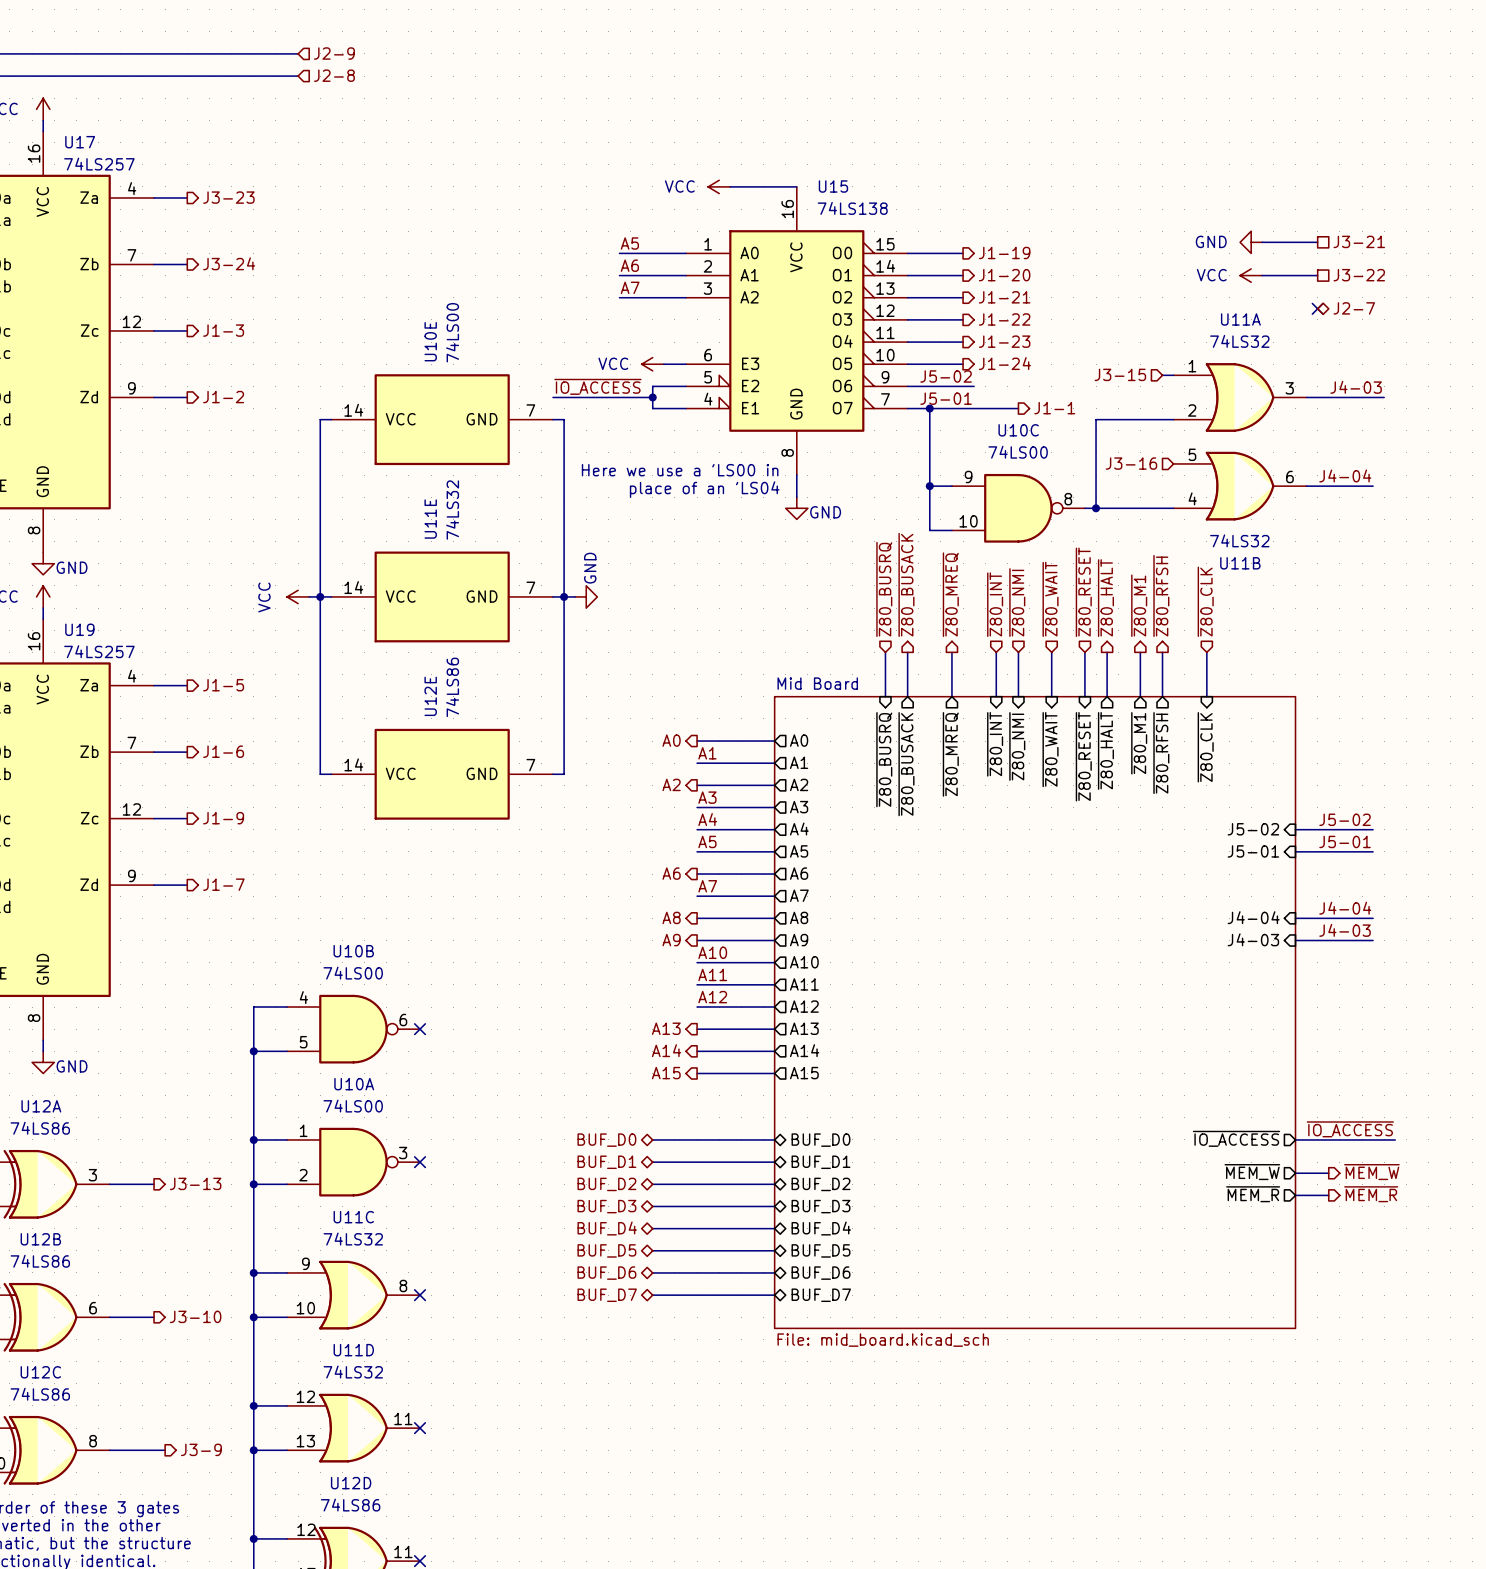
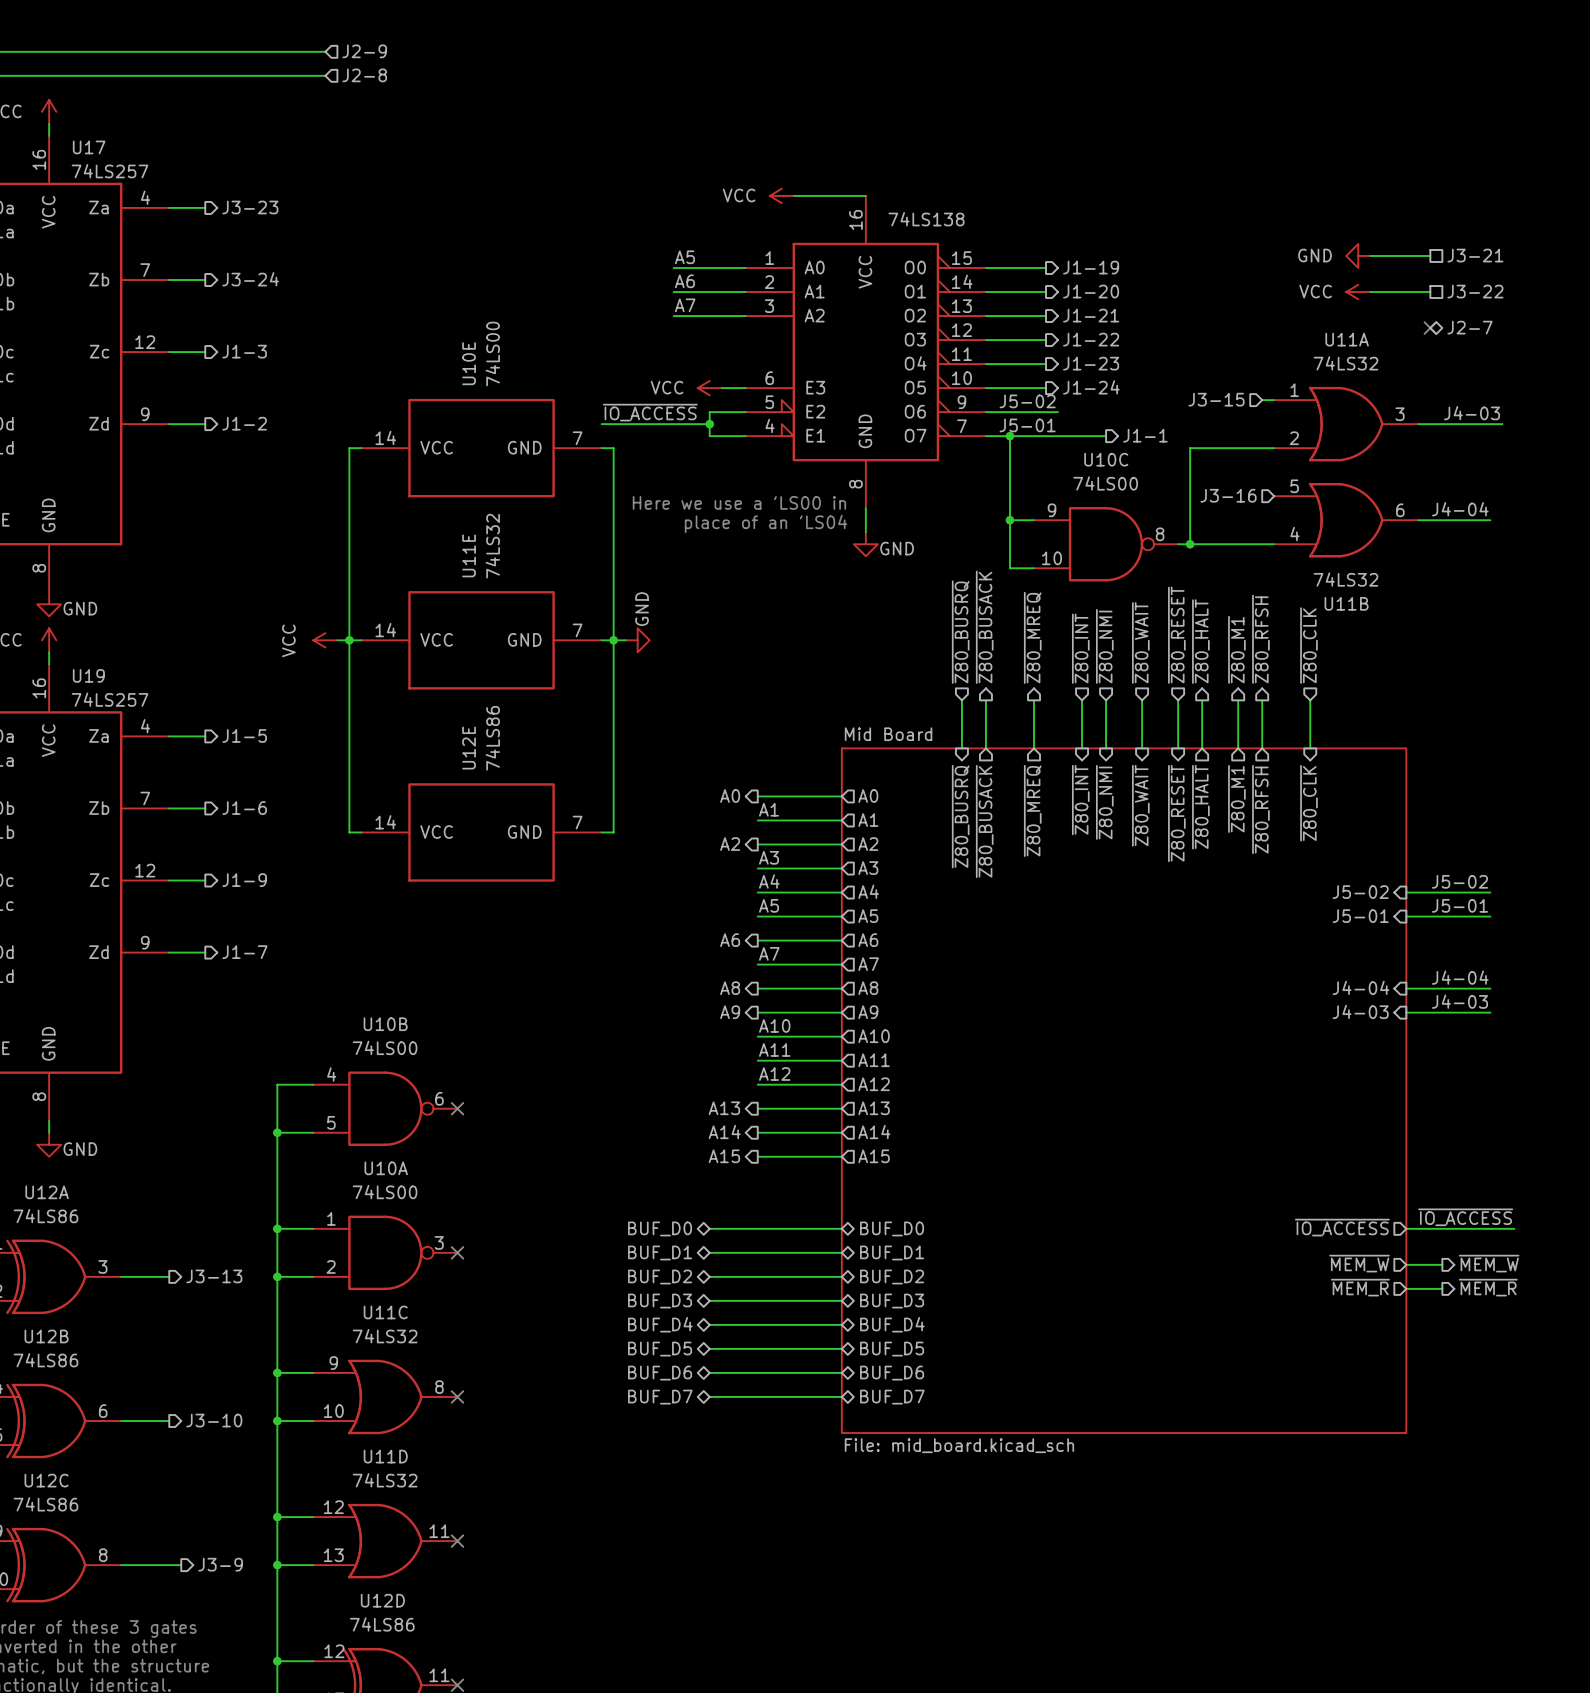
U15 name: U15 (833, 186) -> none

